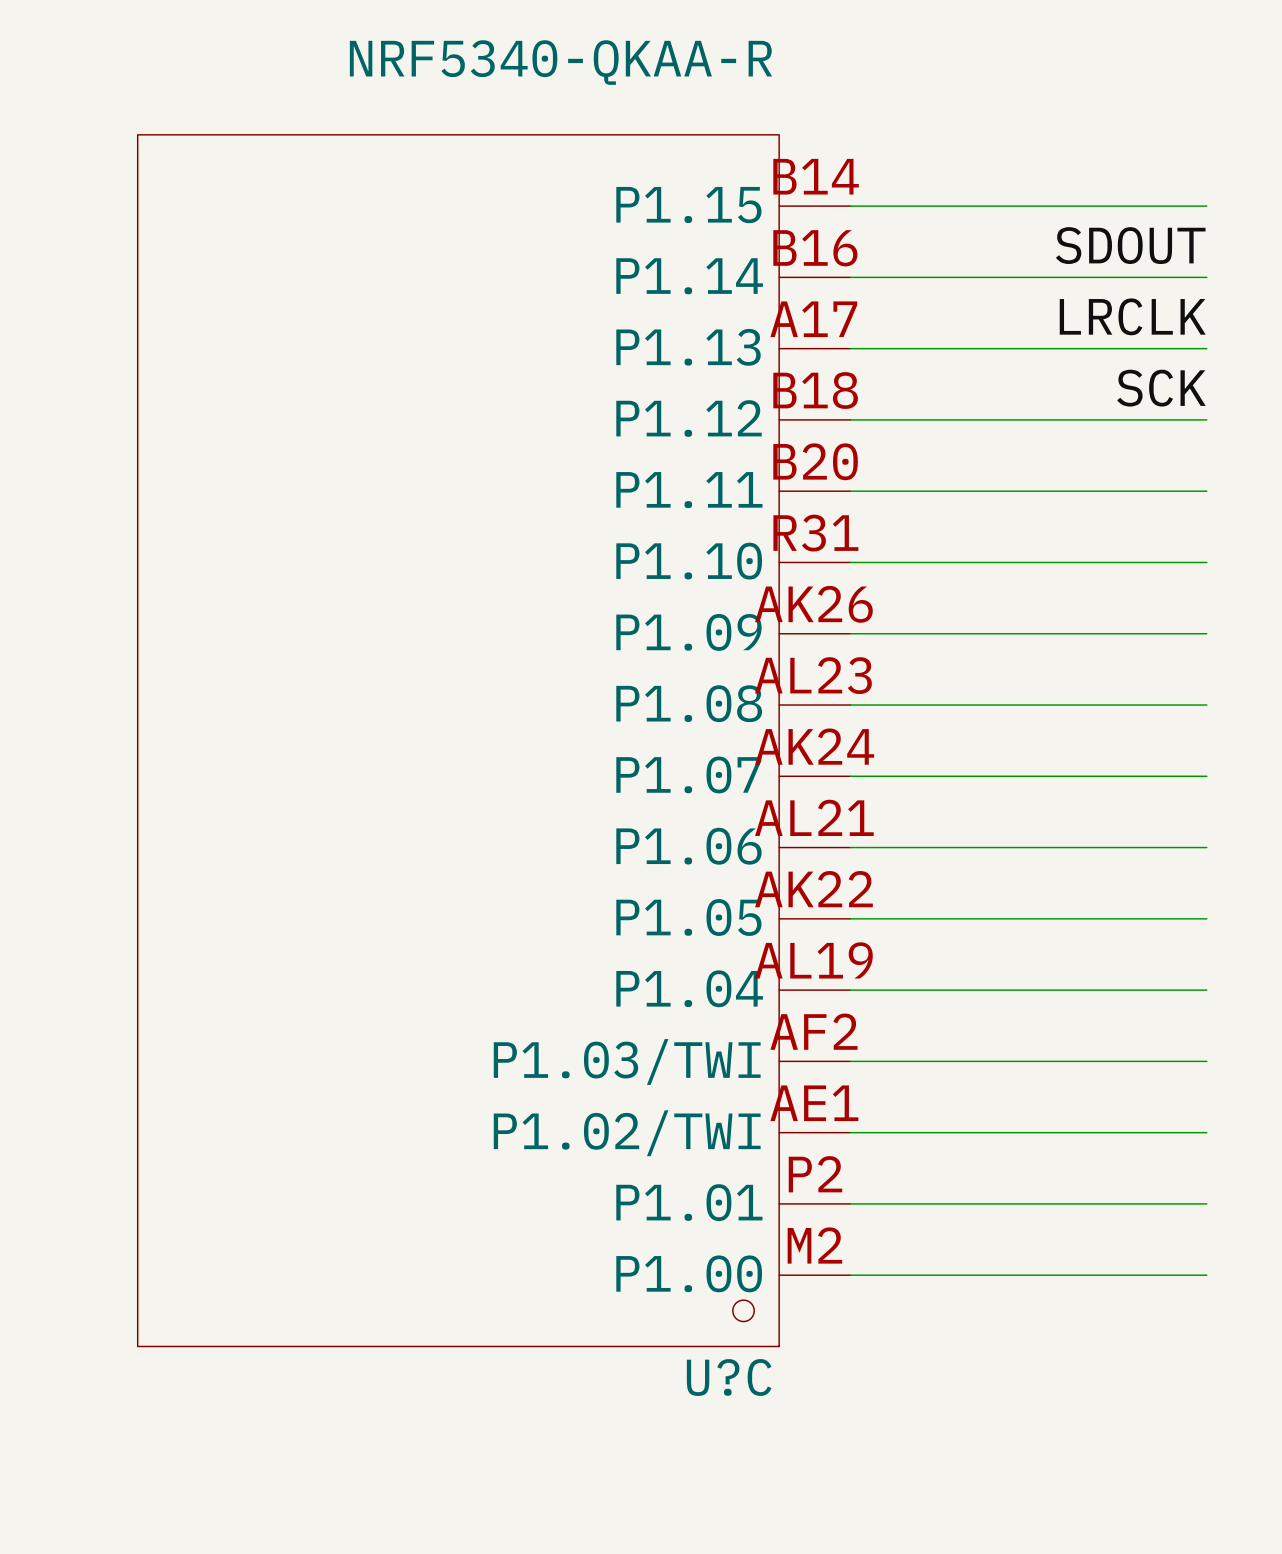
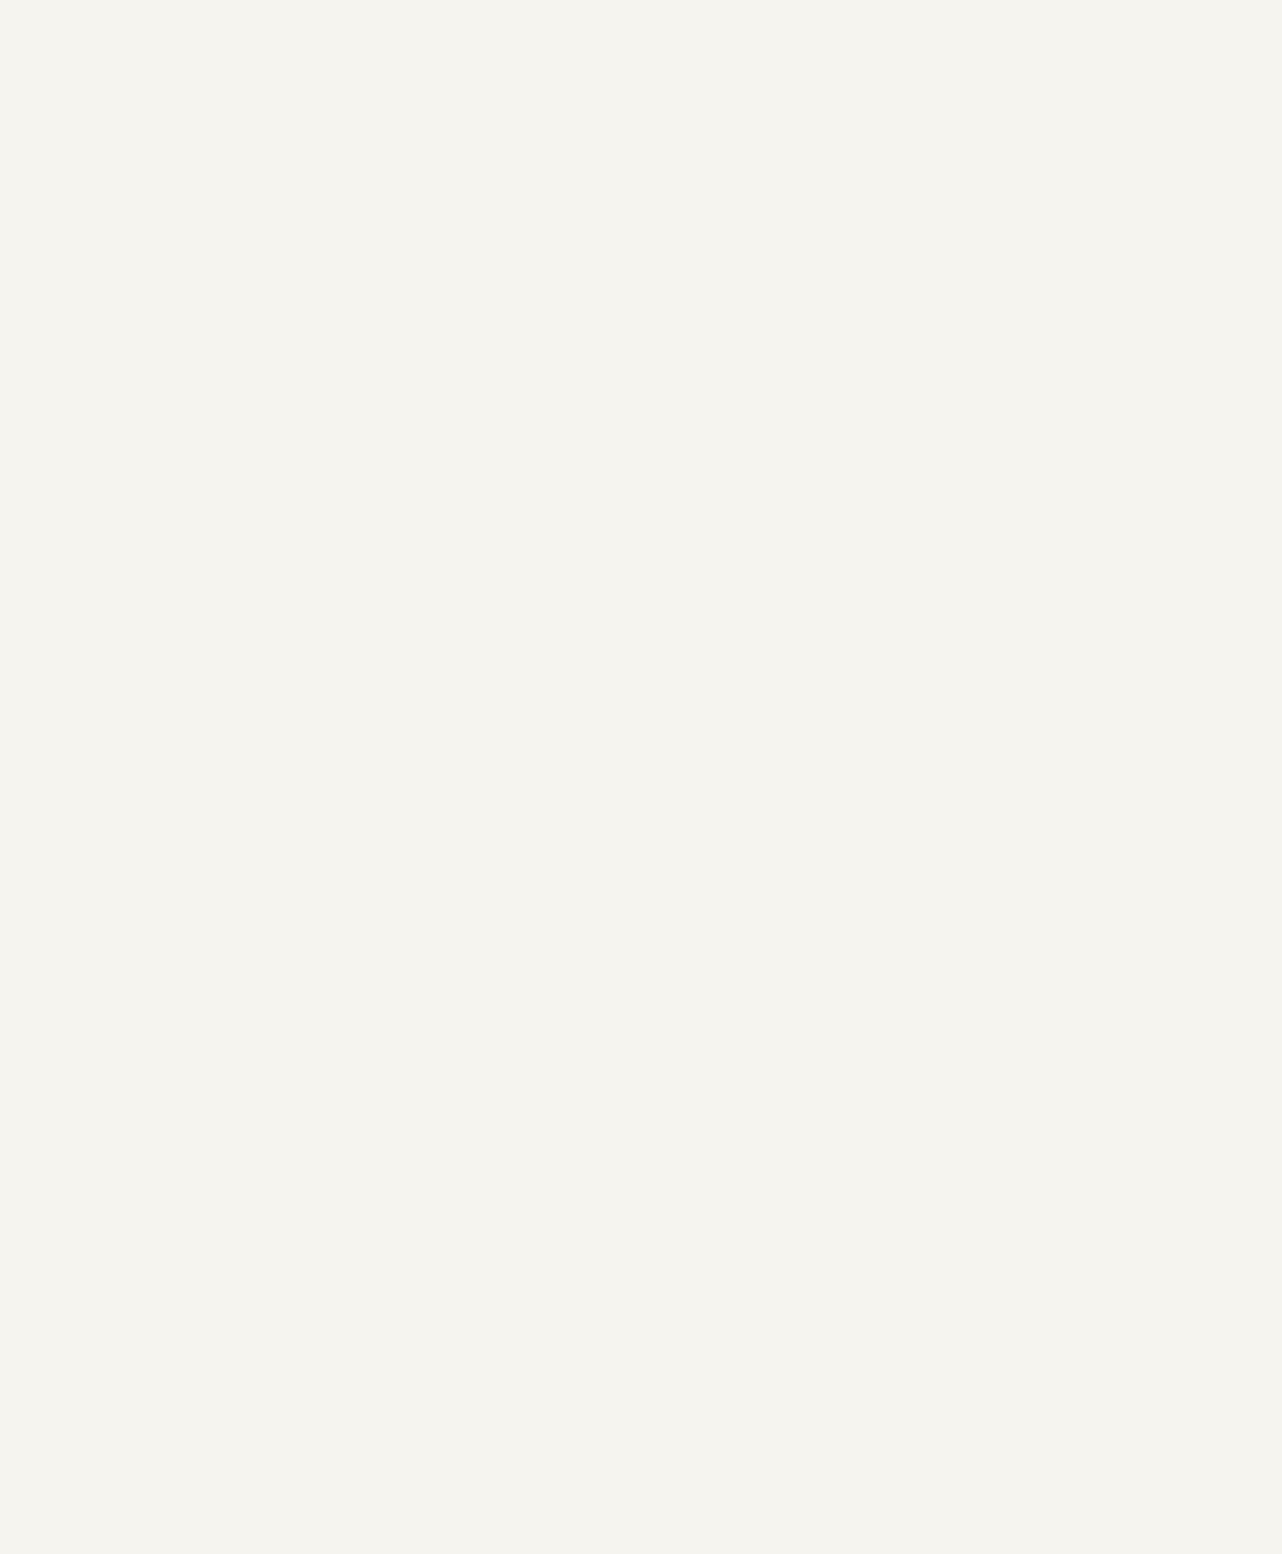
wire: (850, 206) (1206, 206) -> none
label: SDOUT (1130, 245) -> none
wire: (850, 277) (1206, 277) -> none
label: LRCLK (1132, 316) -> none
wire: (850, 348) (1206, 348) -> none
label: SCK (1161, 388) -> none
wire: (850, 419) (1206, 419) -> none
wire: (850, 491) (1206, 491) -> none
wire: (850, 562) (1206, 562) -> none
wire: (850, 633) (1206, 633) -> none
wire: (850, 705) (1206, 705) -> none
U?C: NRF5340-QKAA-R (494, 740) -> none
wire: (850, 776) (1206, 776) -> none
wire: (850, 847) (1206, 847) -> none
wire: (850, 918) (1206, 918) -> none
wire: (850, 990) (1206, 990) -> none
wire: (850, 1061) (1206, 1061) -> none
wire: (850, 1132) (1206, 1132) -> none
wire: (850, 1203) (1206, 1203) -> none
wire: (850, 1275) (1206, 1275) -> none

